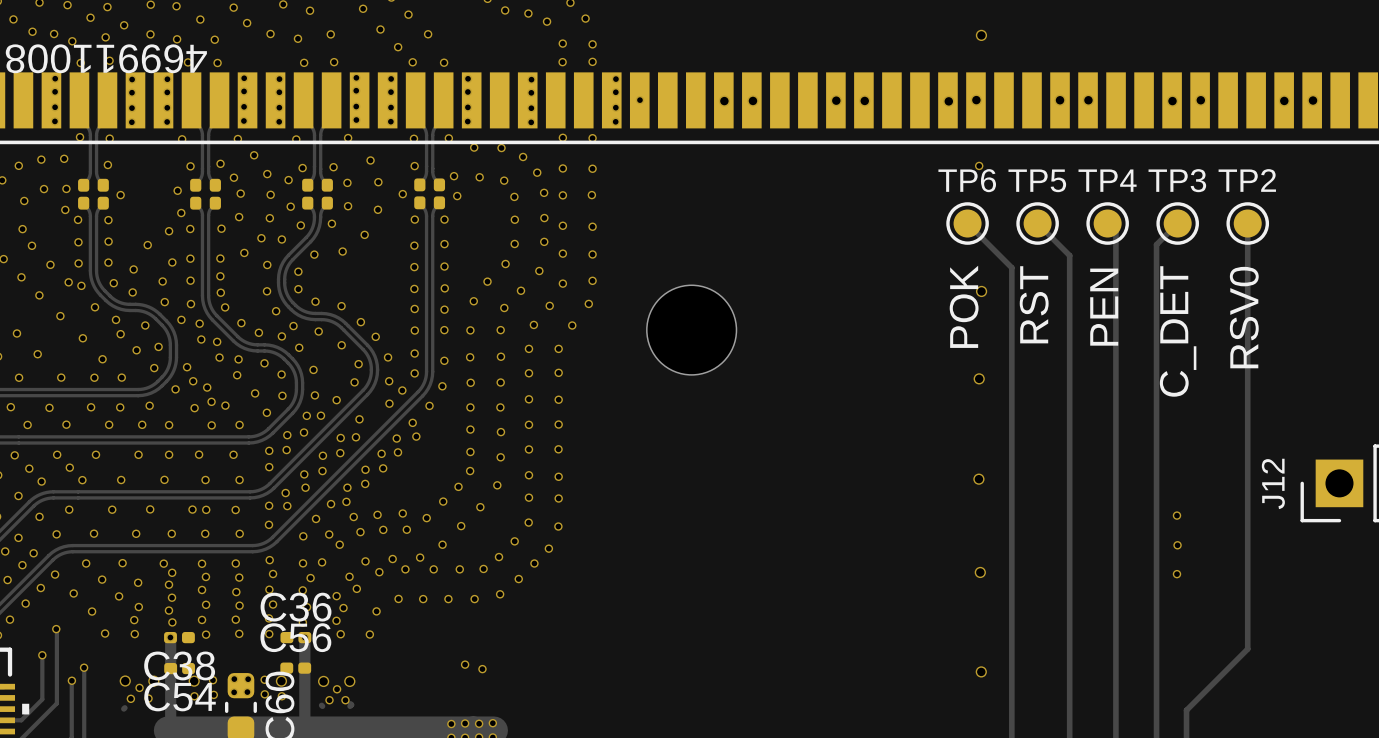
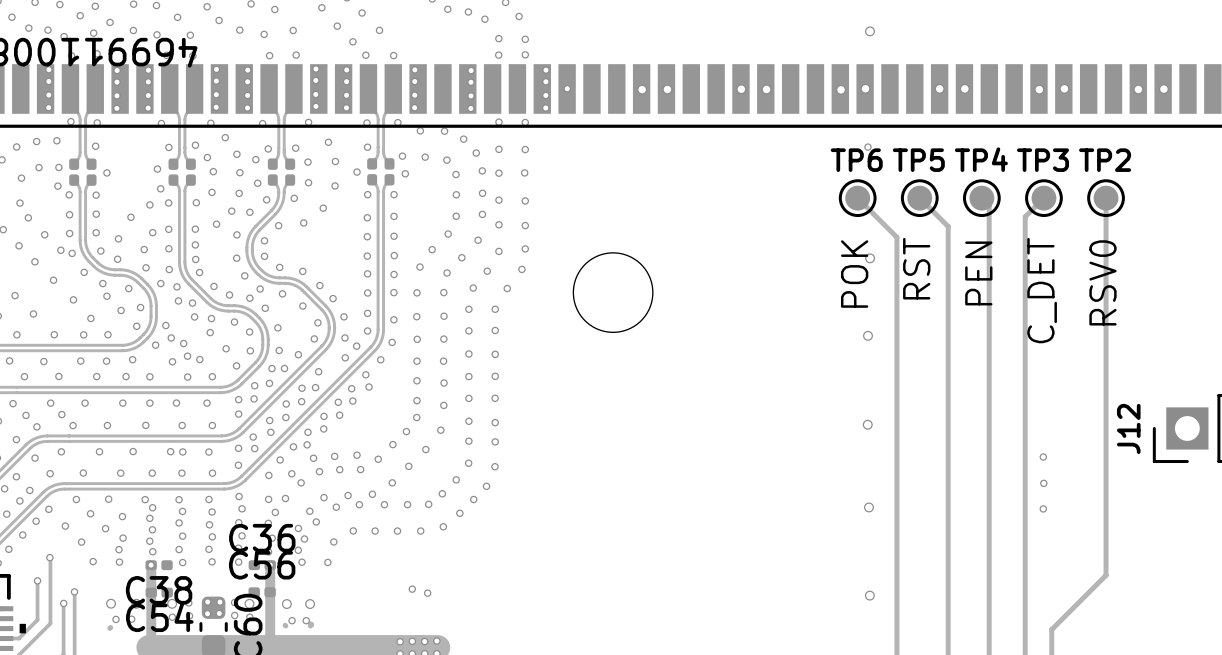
via: (139, 687) -> none
via: (337, 689) -> none

